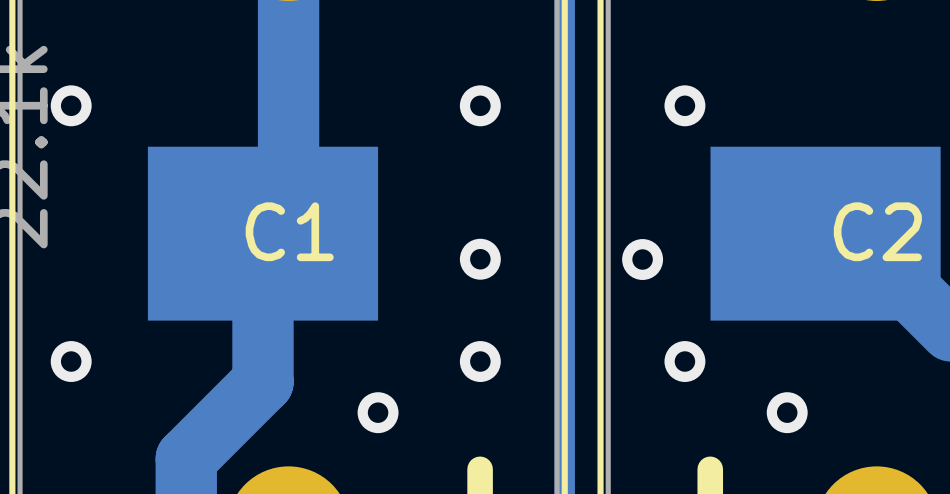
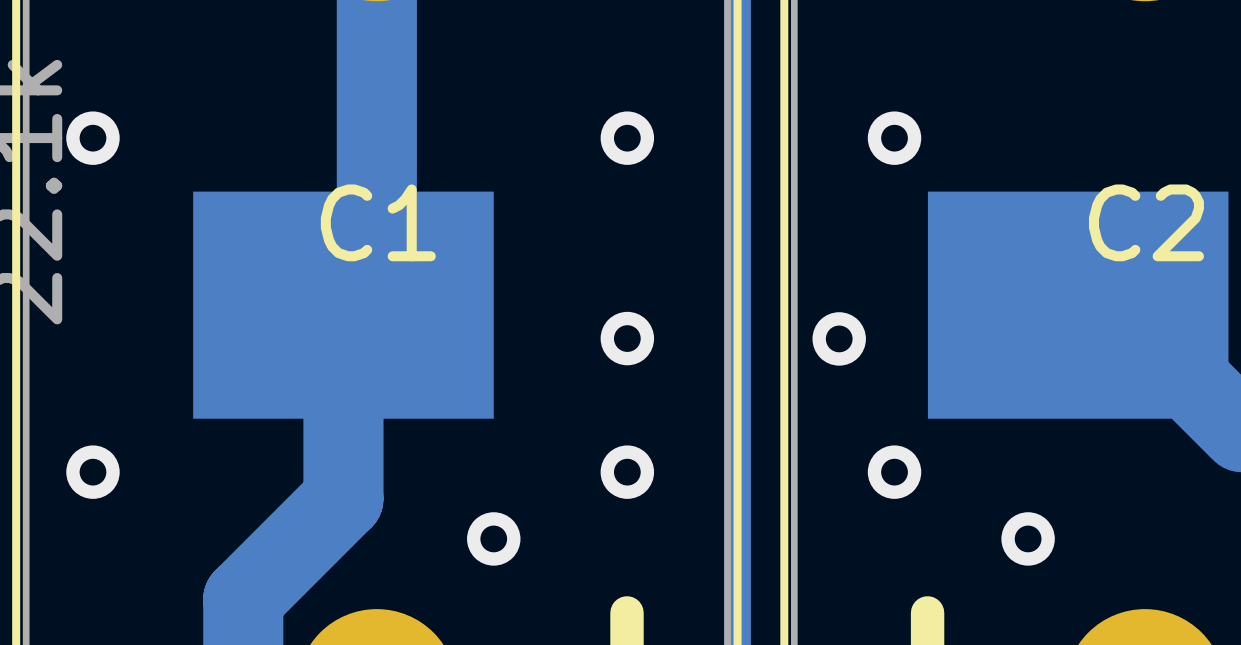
C1 name position: C1 (289, 231) -> C1 (378, 222)
C2 name position: C2 (877, 231) -> C2 (1146, 222)

